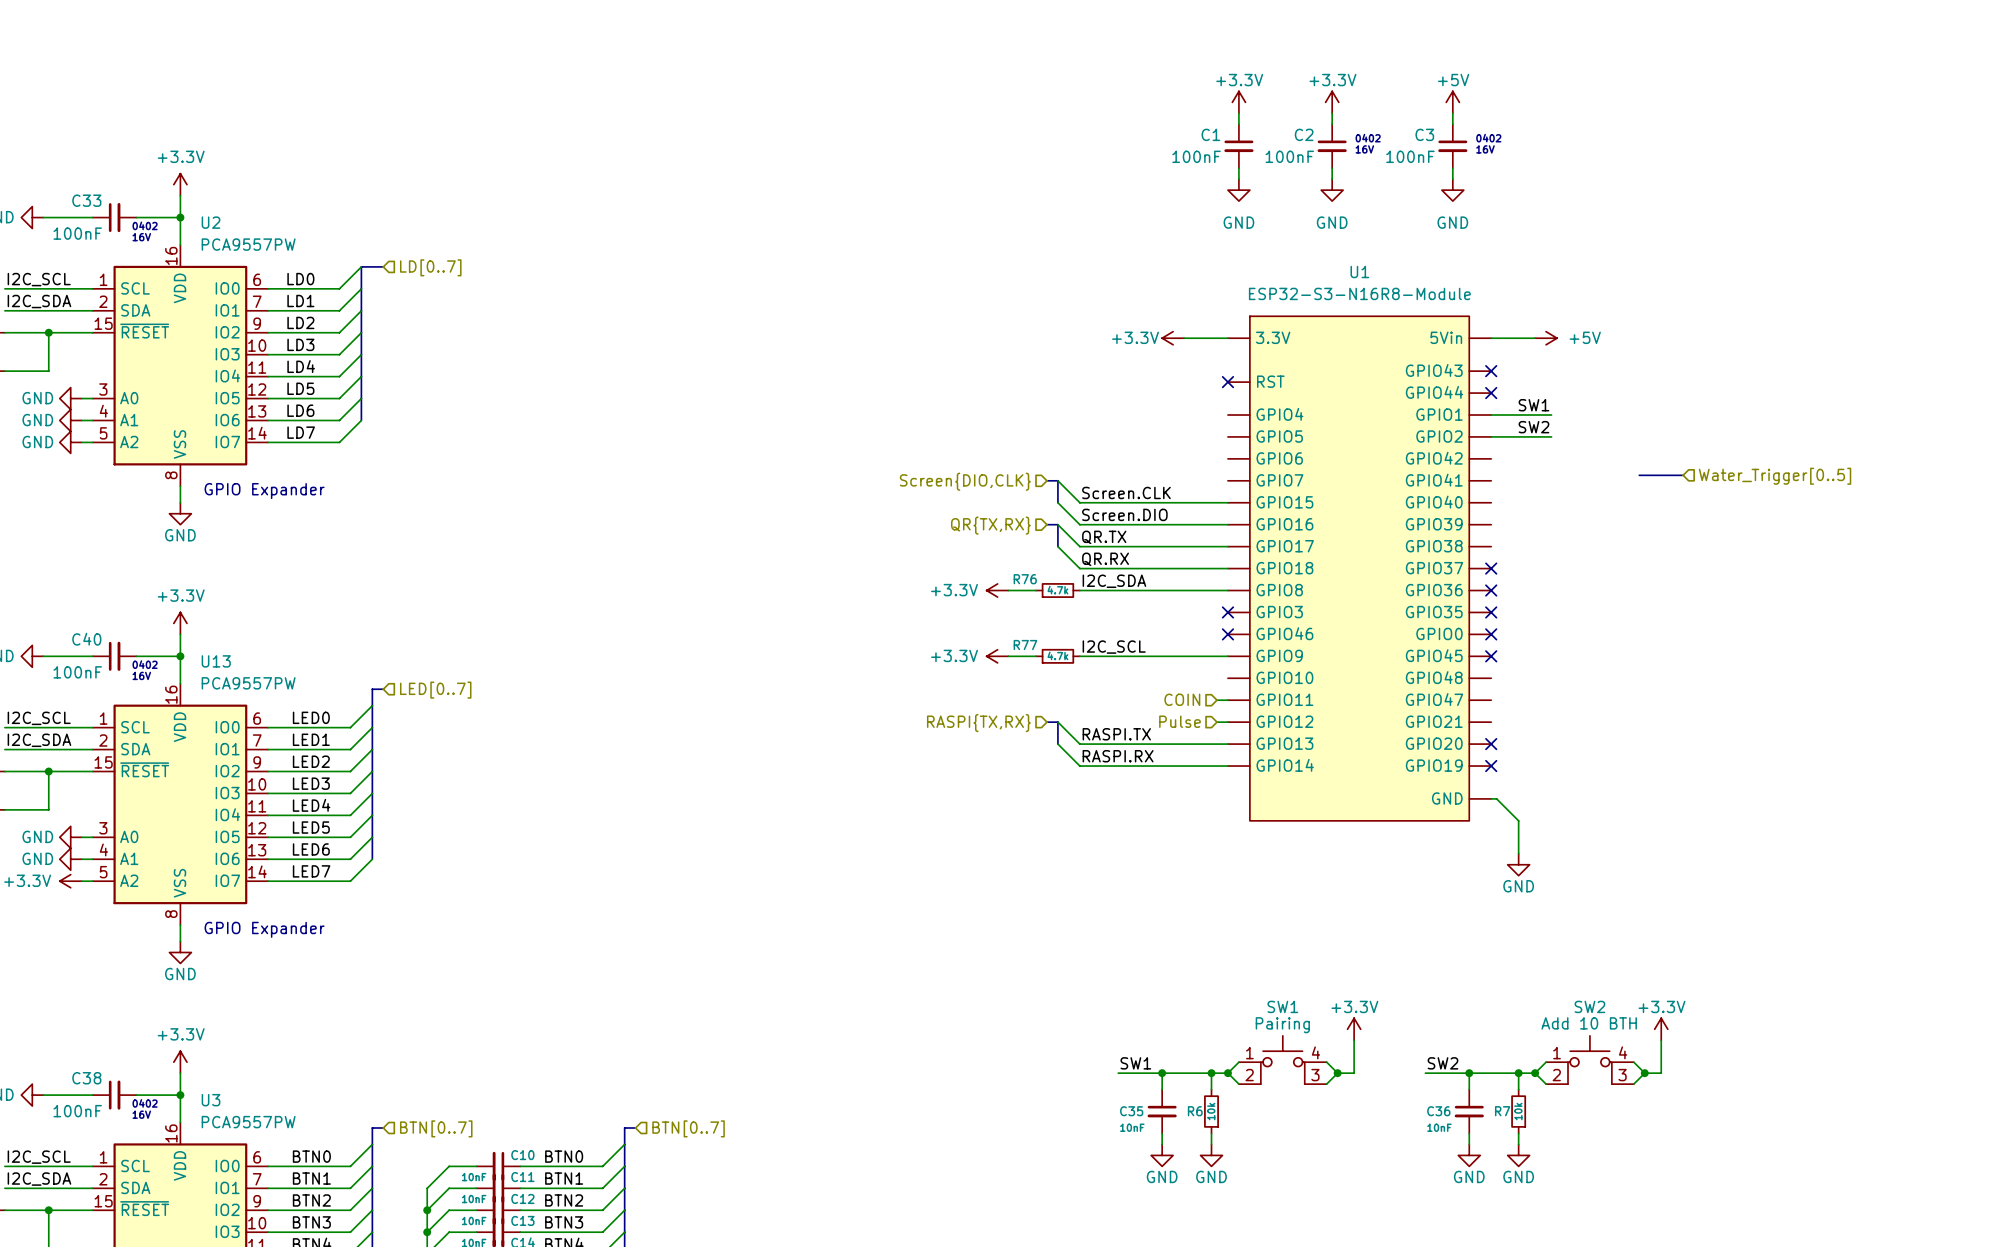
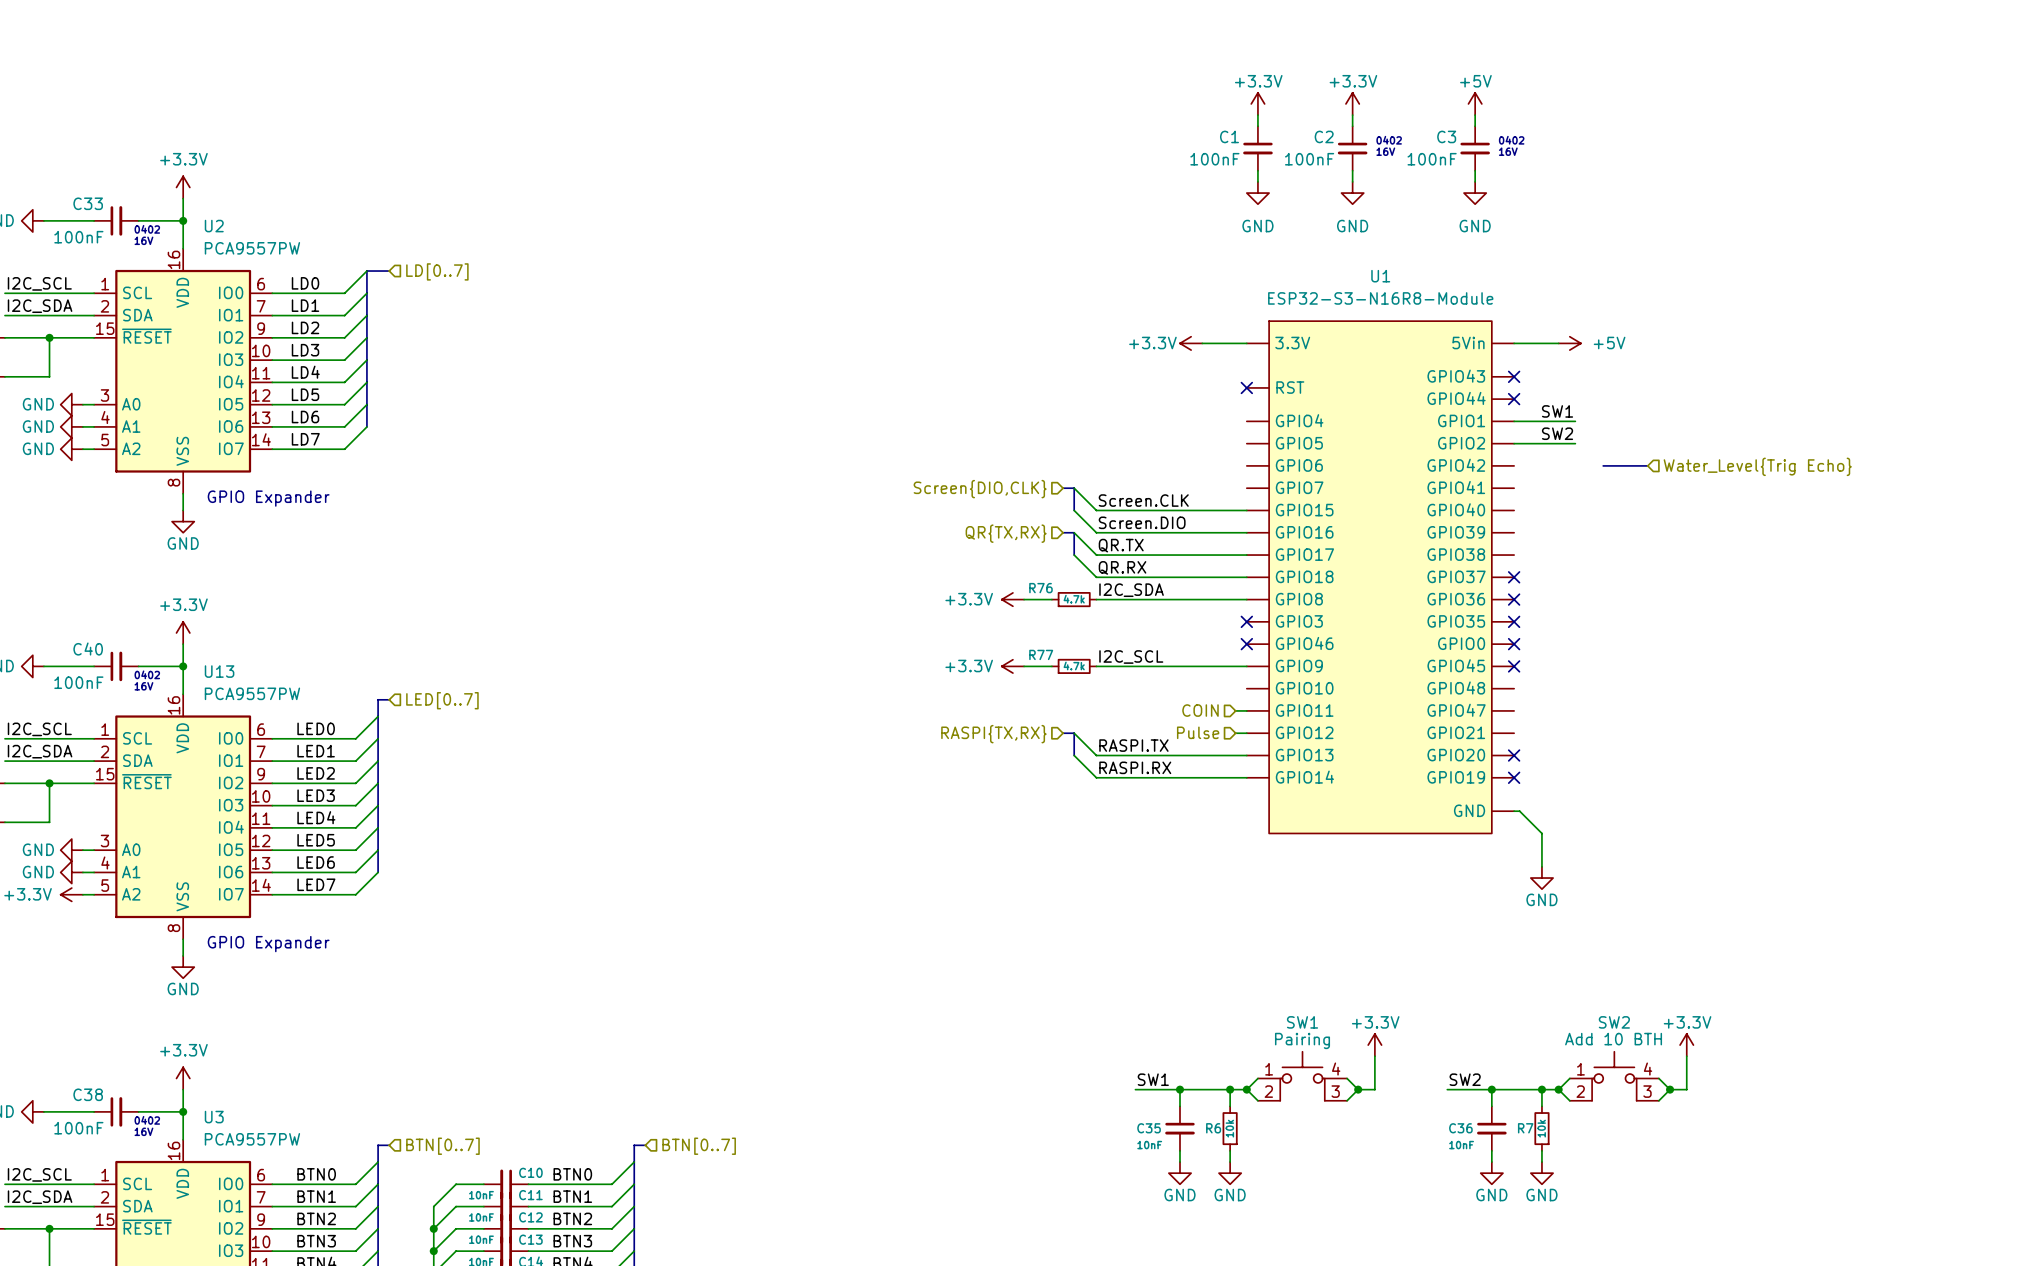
hierarchical label: none -> Water_Level{Trig Echo} (1757, 466)
bus: (1639, 475) (1683, 475) -> (1603, 465) (1647, 465)
hierarchical label: Water_Trigger[0..5] (1775, 476) -> none

